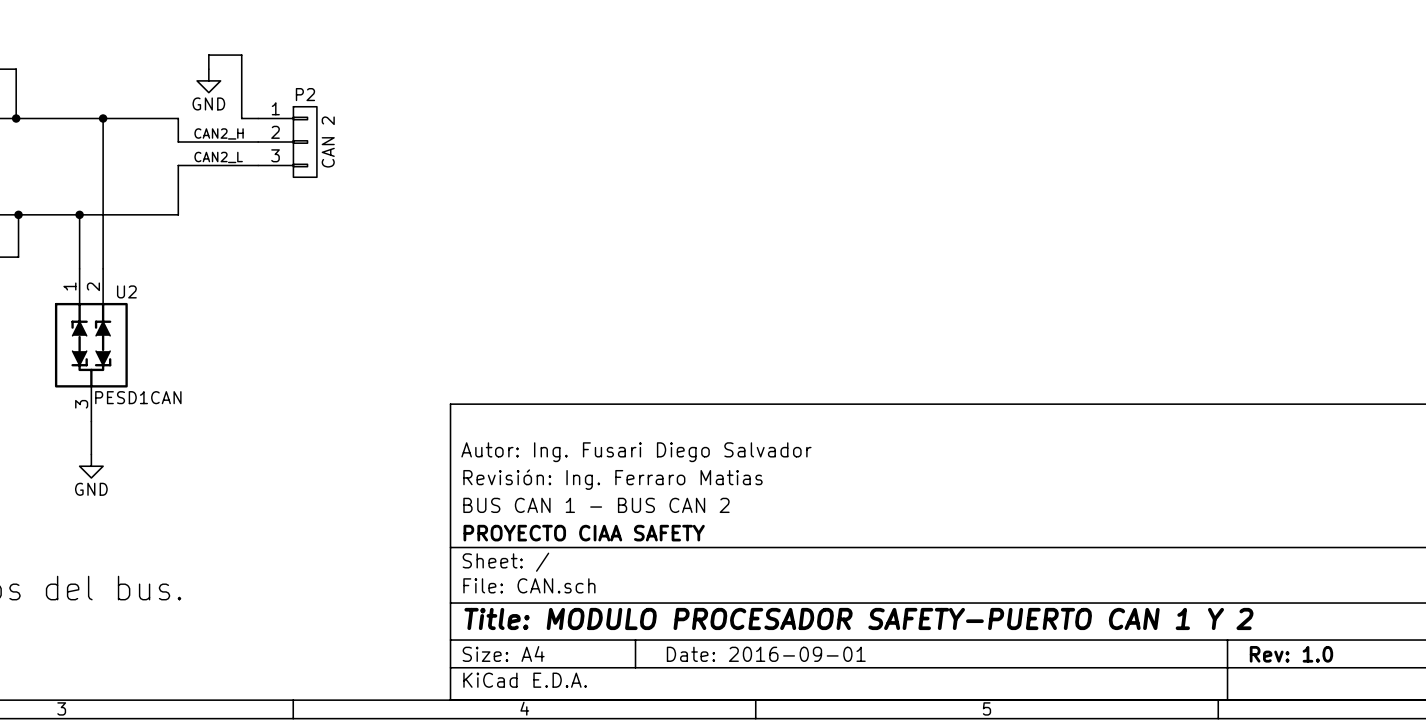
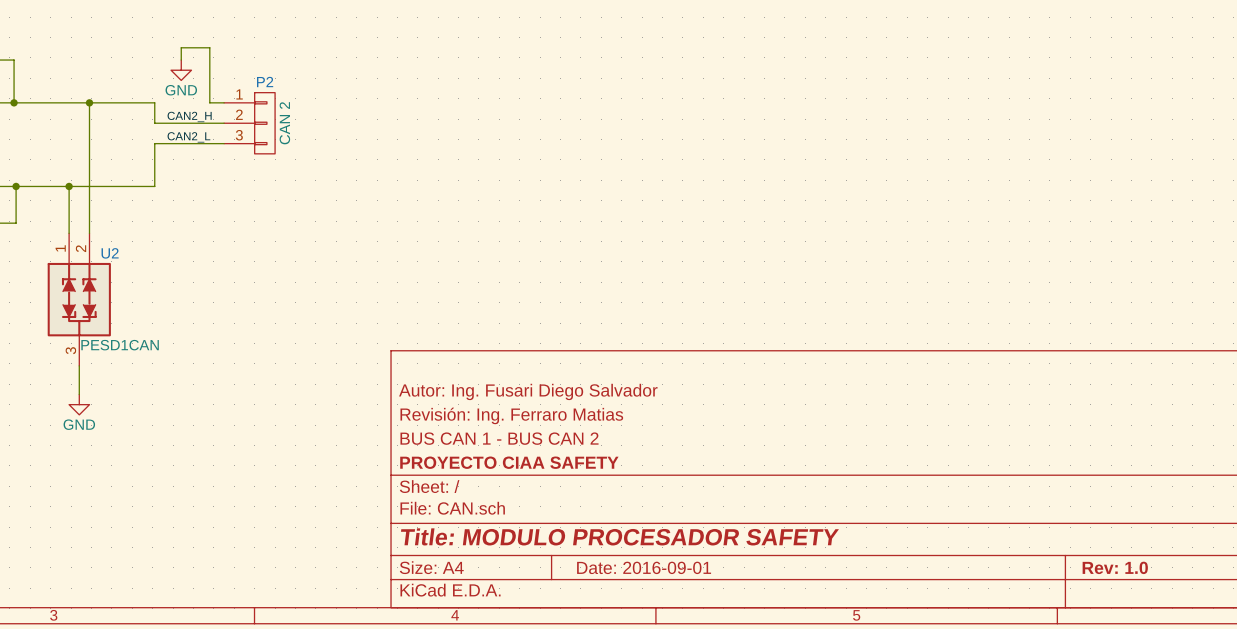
title block: Title: MODULO PROCESADOR SAFETY-PUERTO CAN 1 Y 2 (858, 618) -> Title: MODULO PROCESADOR SAFETY (619, 536)

